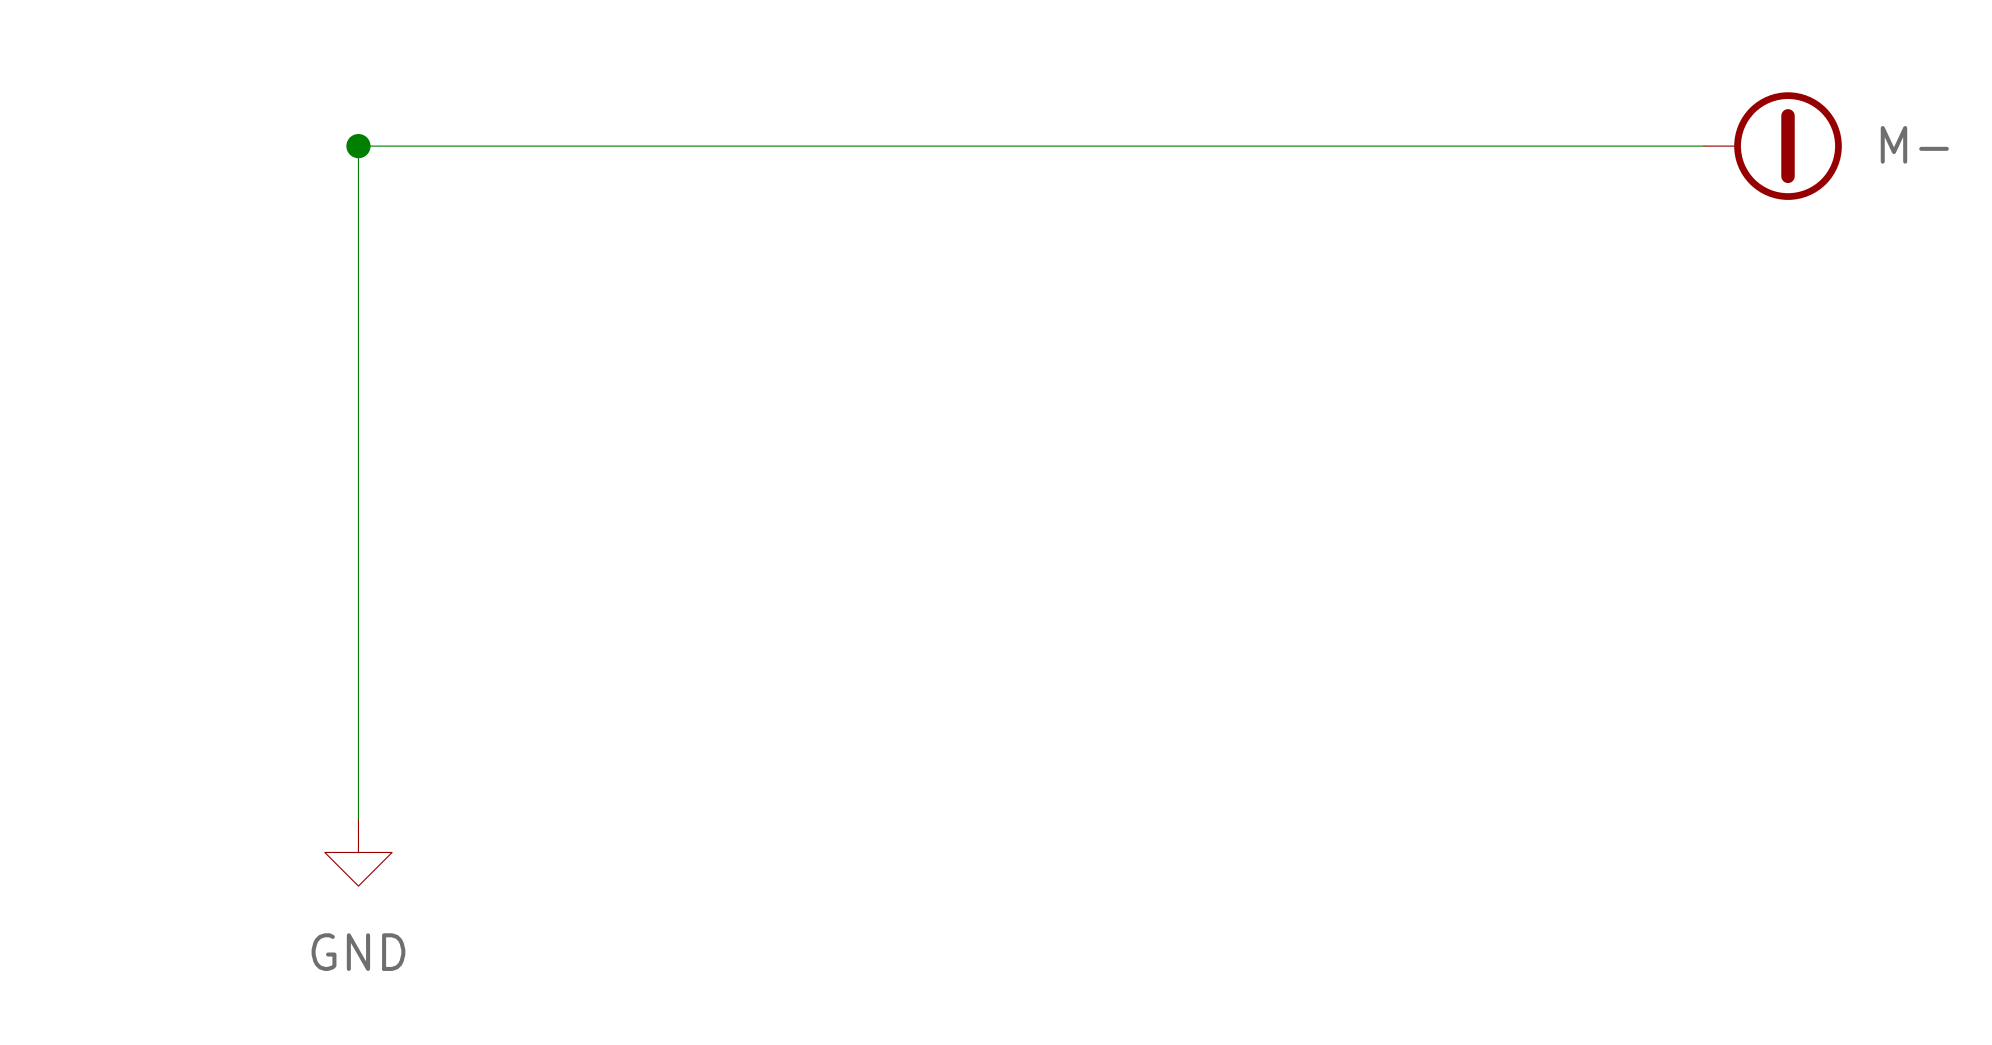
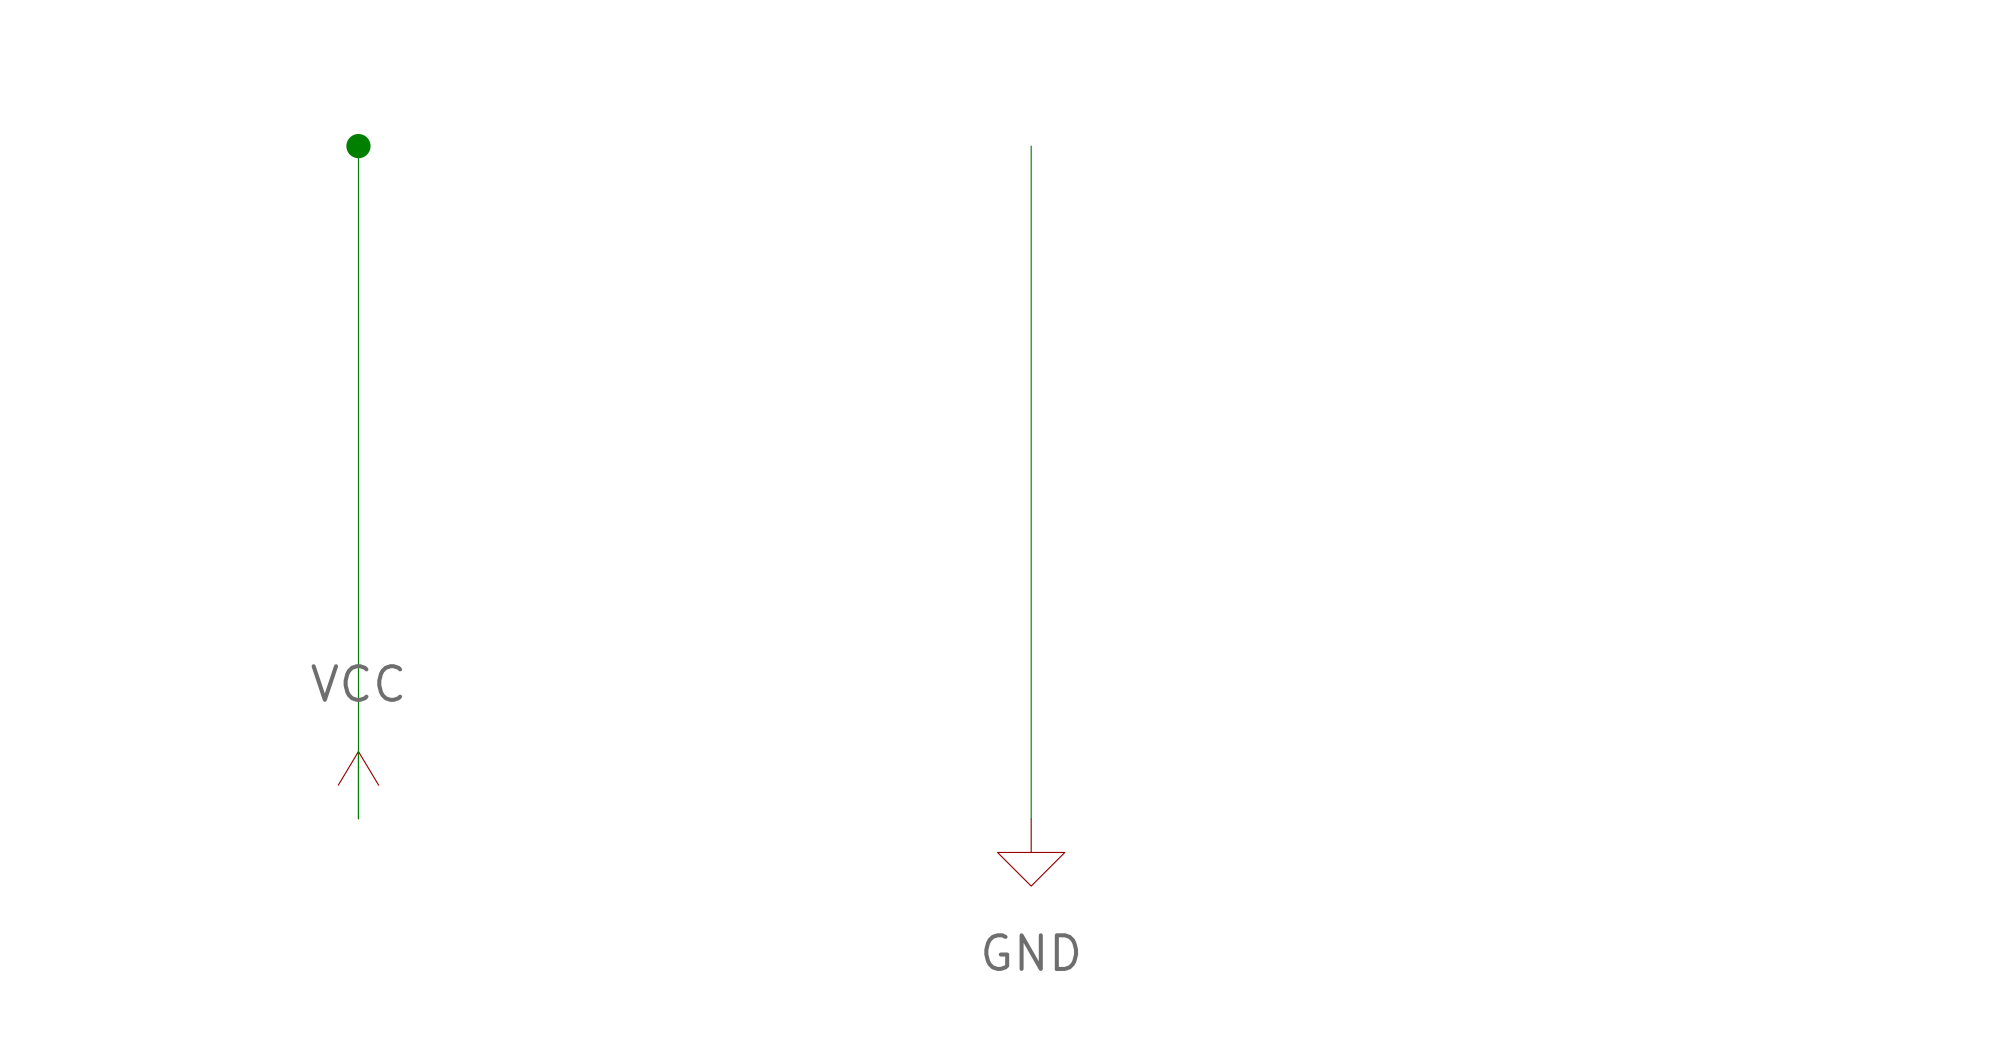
wire: (358, 146) (1703, 146) -> none
wire: none -> (1031, 146) (1031, 818)
power symbol: M- (1772, 146) -> none
power symbol: none -> VCC (358, 785)
power symbol: GND (358, 852) -> none
power symbol: none -> GND (1031, 852)

